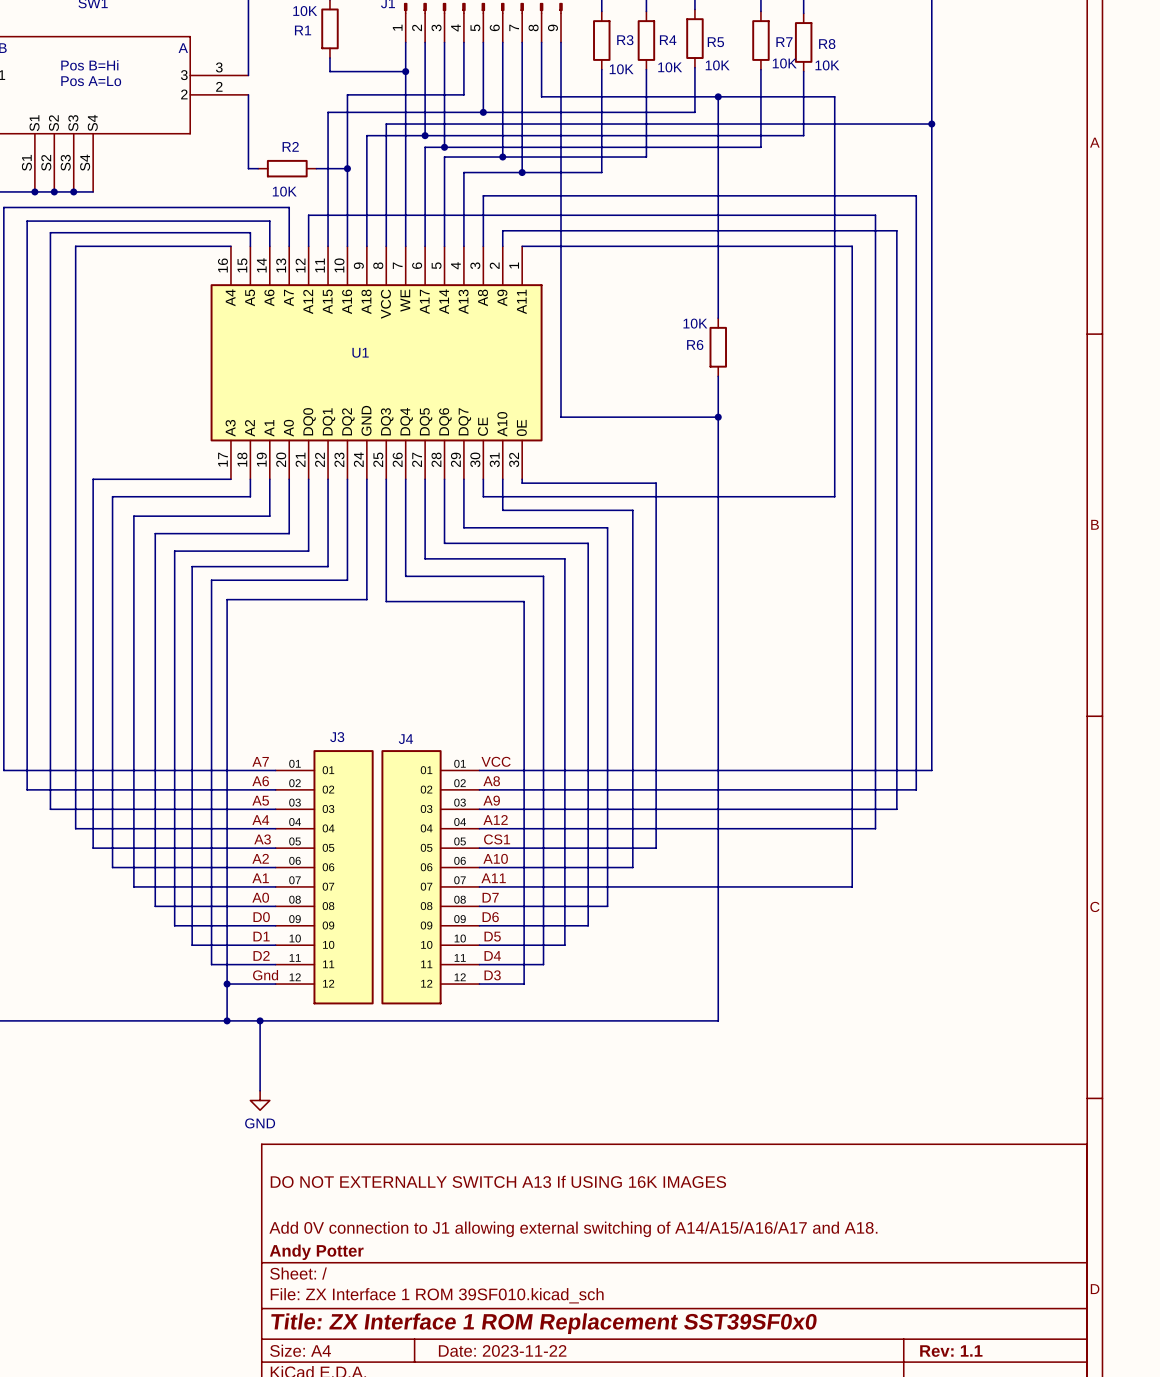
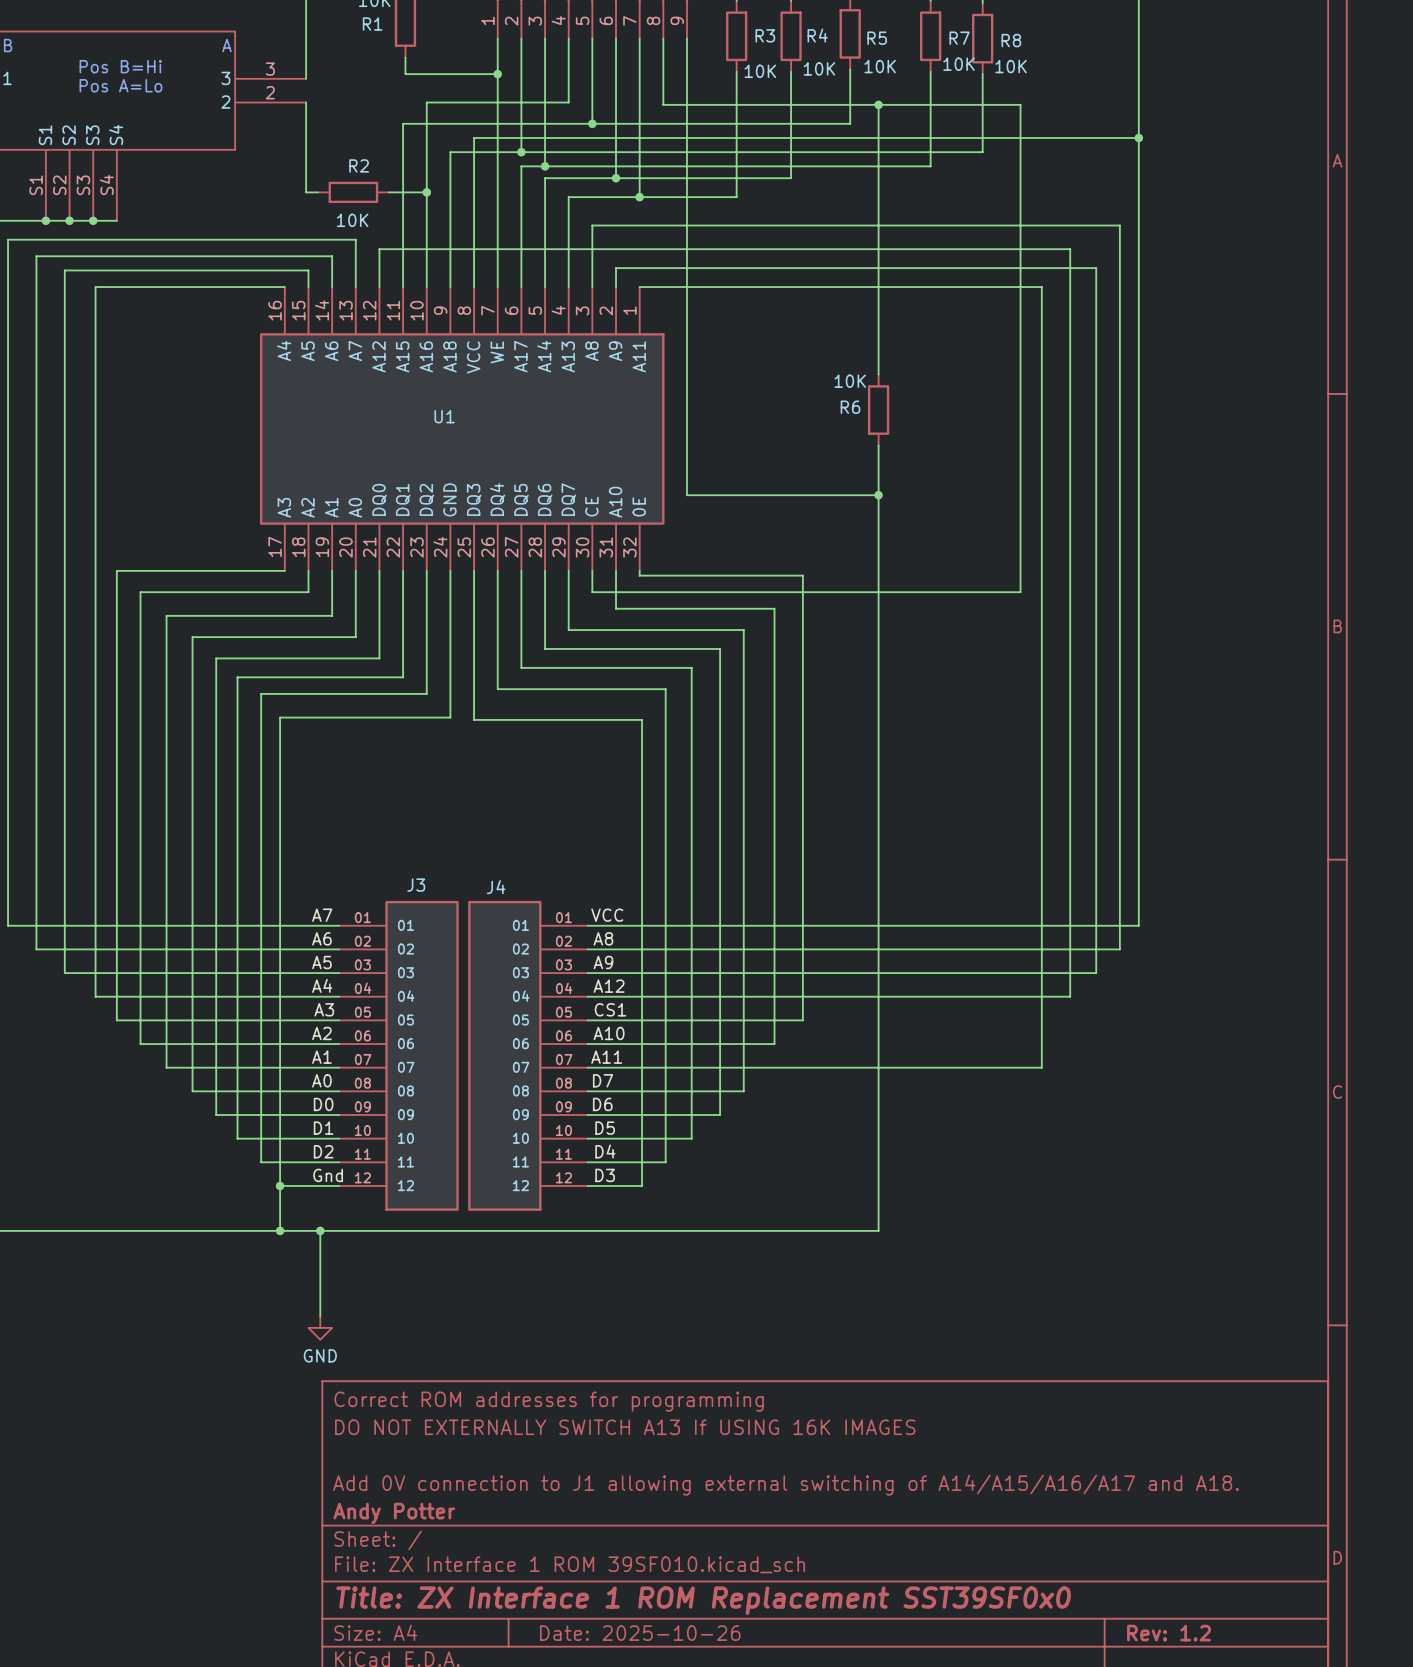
title block: none -> Correct ROM addresses for programming (549, 1401)
title block: Date: 2023-11-22 (502, 1350) -> Date: 2025-10-26 (640, 1633)
title block: Rev: 1.1 (951, 1351) -> Rev: 1.2 (1169, 1633)

